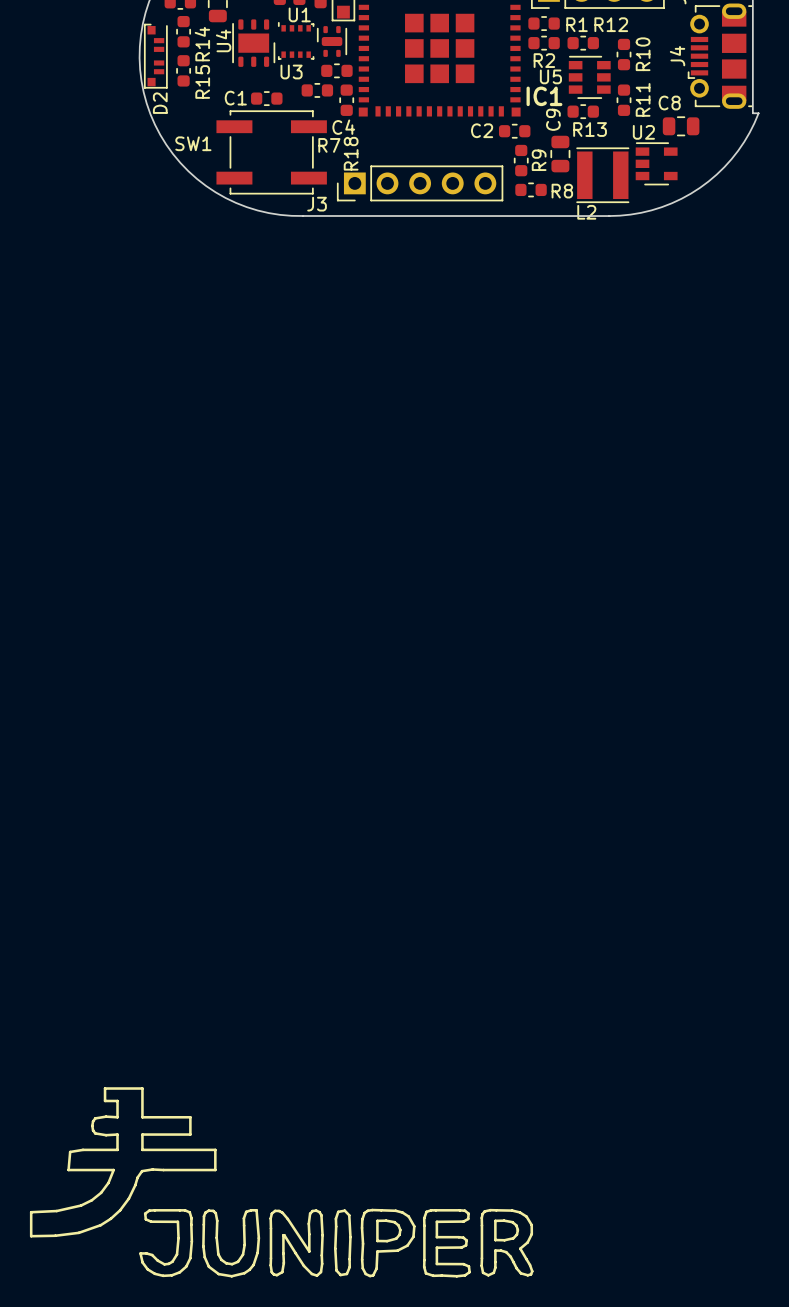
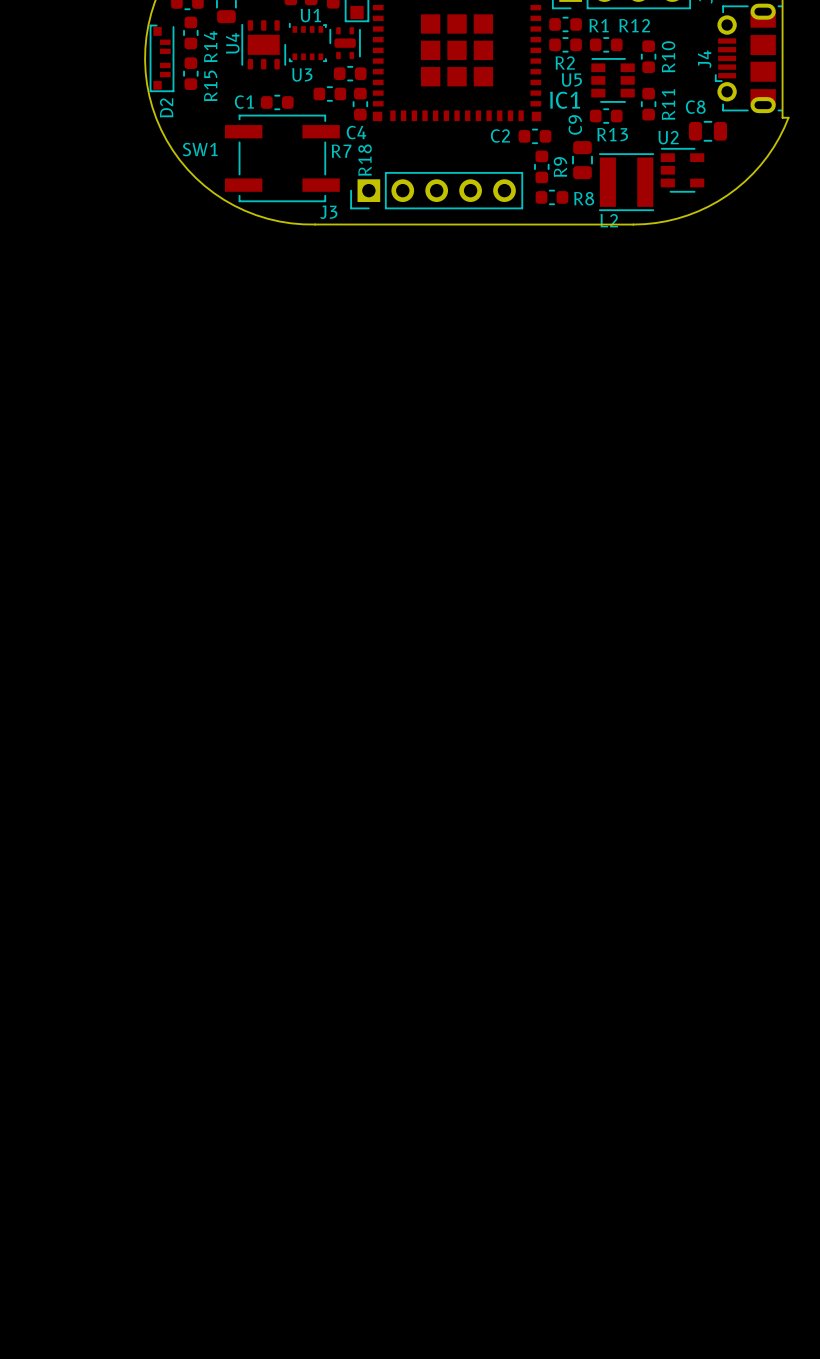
line: (105, 1088) (105, 1100) (117, 1100) (117, 1117) (95, 1118) (93, 1121) (93, 1130) (95, 1133) (117, 1134) (117, 1149) (82, 1149) (70, 1151) (68, 1170) (113, 1170) (108, 1182) (101, 1192) (81, 1205) (56, 1211) (31, 1212) (31, 1236) (78, 1232) (100, 1225) (120, 1210) (128, 1198) (142, 1171) (152, 1169) (215, 1170) (215, 1149) (142, 1149) (142, 1134) (190, 1134) (190, 1117) (142, 1117) (142, 1088) (105, 1088) -> none
line: (154, 1210) (149, 1210) (145, 1213) (145, 1219) (151, 1221) (177, 1221) (177, 1254) (172, 1261) (164, 1264) (152, 1255) (140, 1253) (142, 1262) (147, 1269) (154, 1273) (171, 1275) (179, 1272) (186, 1266) (190, 1258) (191, 1218) (189, 1212) (185, 1210) (154, 1210) -> none
line: (251, 1210) (246, 1211) (243, 1218) (243, 1254) (238, 1261) (232, 1264) (221, 1259) (218, 1254) (215, 1213) (208, 1210) (205, 1212) (203, 1246) (204, 1257) (208, 1266) (218, 1274) (231, 1276) (244, 1273) (253, 1264) (257, 1252) (258, 1238) (256, 1210) (251, 1210) -> none
line: (316, 1210) (310, 1213) (309, 1251) (282, 1212) (275, 1210) (271, 1213) (270, 1265) (273, 1274) (282, 1272) (283, 1235) (303, 1265) (311, 1274) (316, 1275) (321, 1272) (321, 1215) (316, 1210) -> none
line: (344, 1210) (349, 1215) (349, 1267) (346, 1273) (340, 1275) (336, 1270) (335, 1218) (338, 1211) (344, 1210) -> none
line: (372, 1210) (364, 1213) (362, 1227) (362, 1268) (365, 1273) (370, 1276) (373, 1275) (376, 1268) (377, 1251) (397, 1250) (407, 1245) (413, 1236) (414, 1226) (408, 1216) (402, 1212) (372, 1210) -> none
line: (431, 1210) (426, 1211) (424, 1218) (424, 1267) (425, 1273) (433, 1275) (464, 1275) (469, 1272) (468, 1266) (463, 1264) (436, 1264) (436, 1247) (461, 1247) (466, 1245) (466, 1240) (458, 1237) (436, 1237) (436, 1221) (463, 1221) (468, 1218) (468, 1213) (464, 1210) (431, 1210) -> none
line: (490, 1210) (484, 1211) (481, 1217) (483, 1272) (488, 1275) (493, 1272) (495, 1250) (500, 1250) (506, 1252) (510, 1256) (520, 1273) (531, 1274) (532, 1271) (530, 1265) (520, 1248) (527, 1242) (531, 1234) (531, 1225) (526, 1216) (512, 1210) (490, 1210) -> none
line: (386, 1220) (394, 1222) (398, 1225) (399, 1234) (396, 1238) (377, 1241) (377, 1220) (386, 1220) -> none
line: (504, 1220) (512, 1222) (516, 1225) (516, 1234) (513, 1238) (495, 1240) (495, 1220) (504, 1220) -> none

